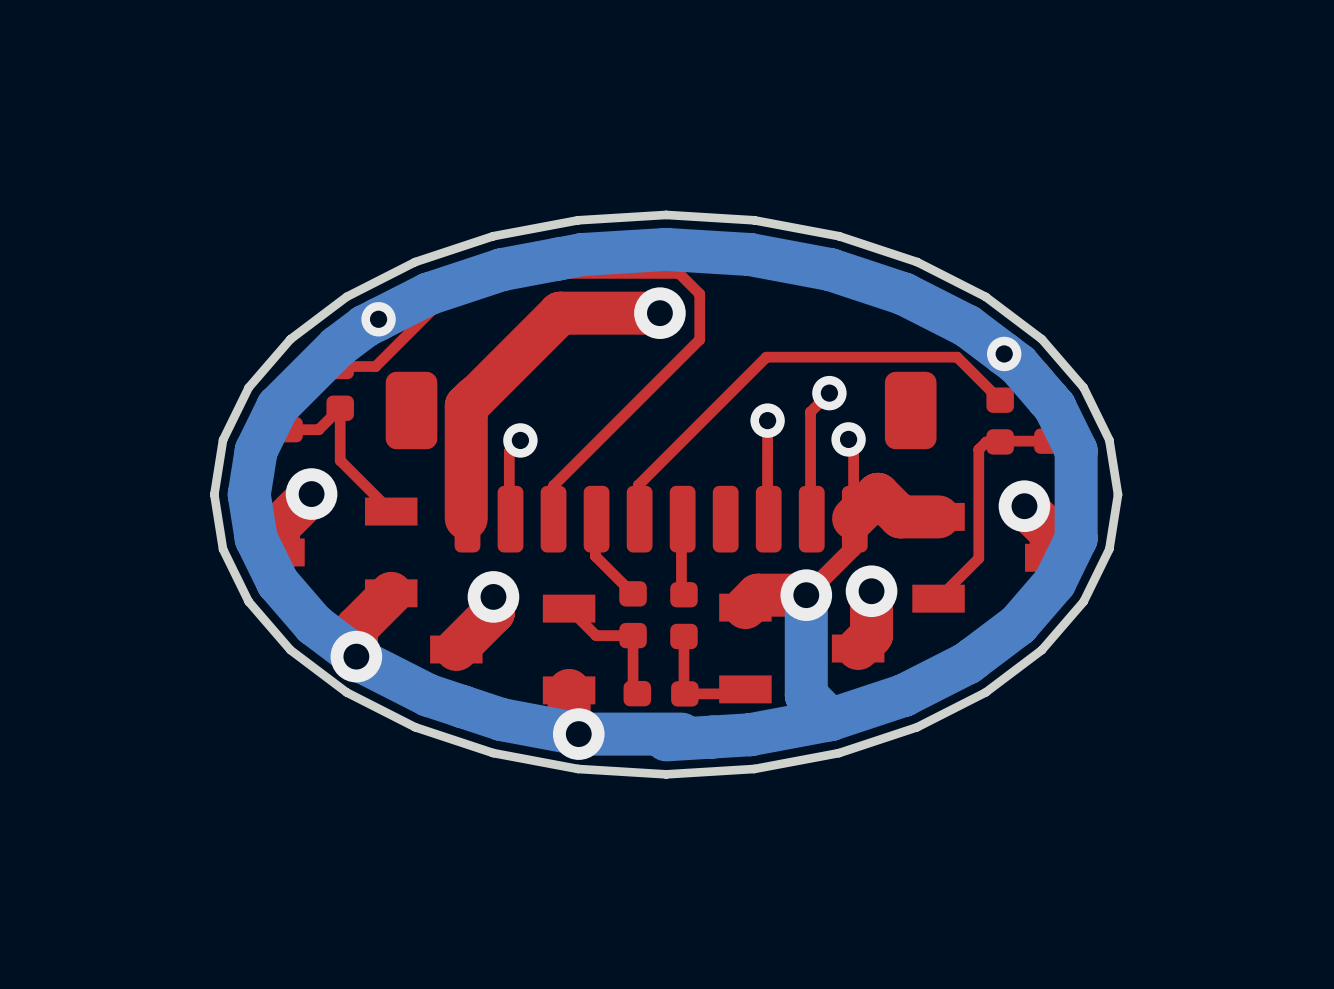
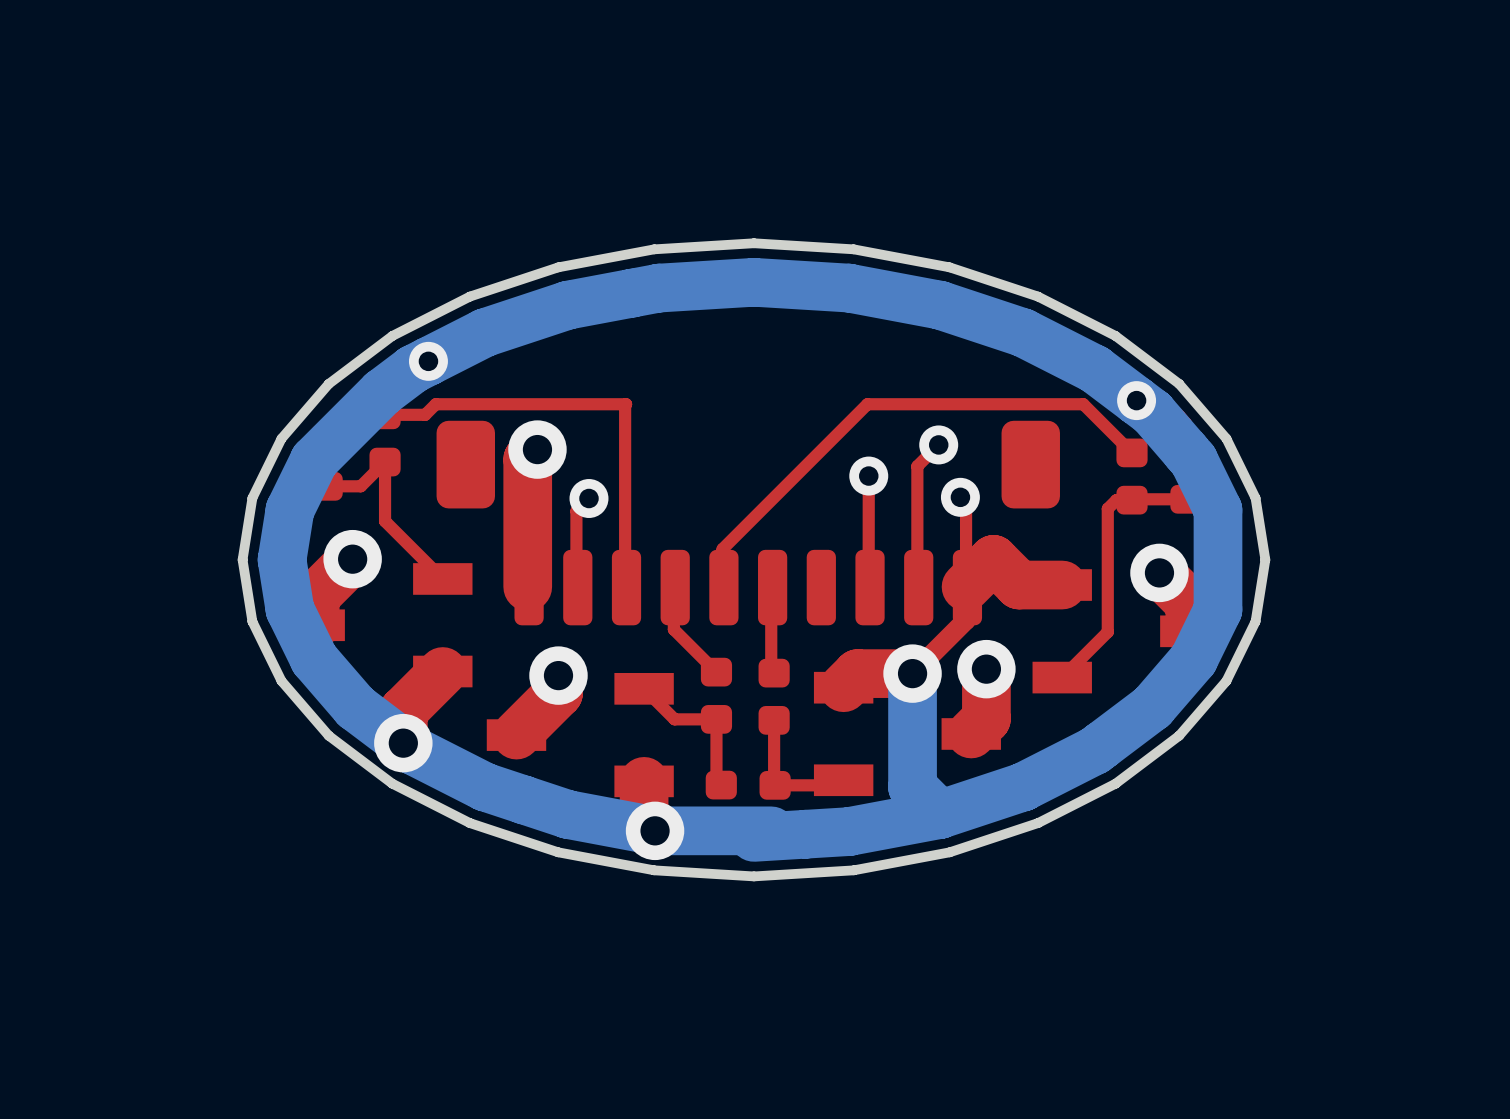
top track: (659, 313) (560, 313) (467, 405) -> none
via position: (659, 313) -> (537, 449)
top track: (385, 357) (468, 273) (679, 273) (699, 294) (699, 339) (553, 485) (553, 519) -> (435, 404) (626, 404) (625, 586)

